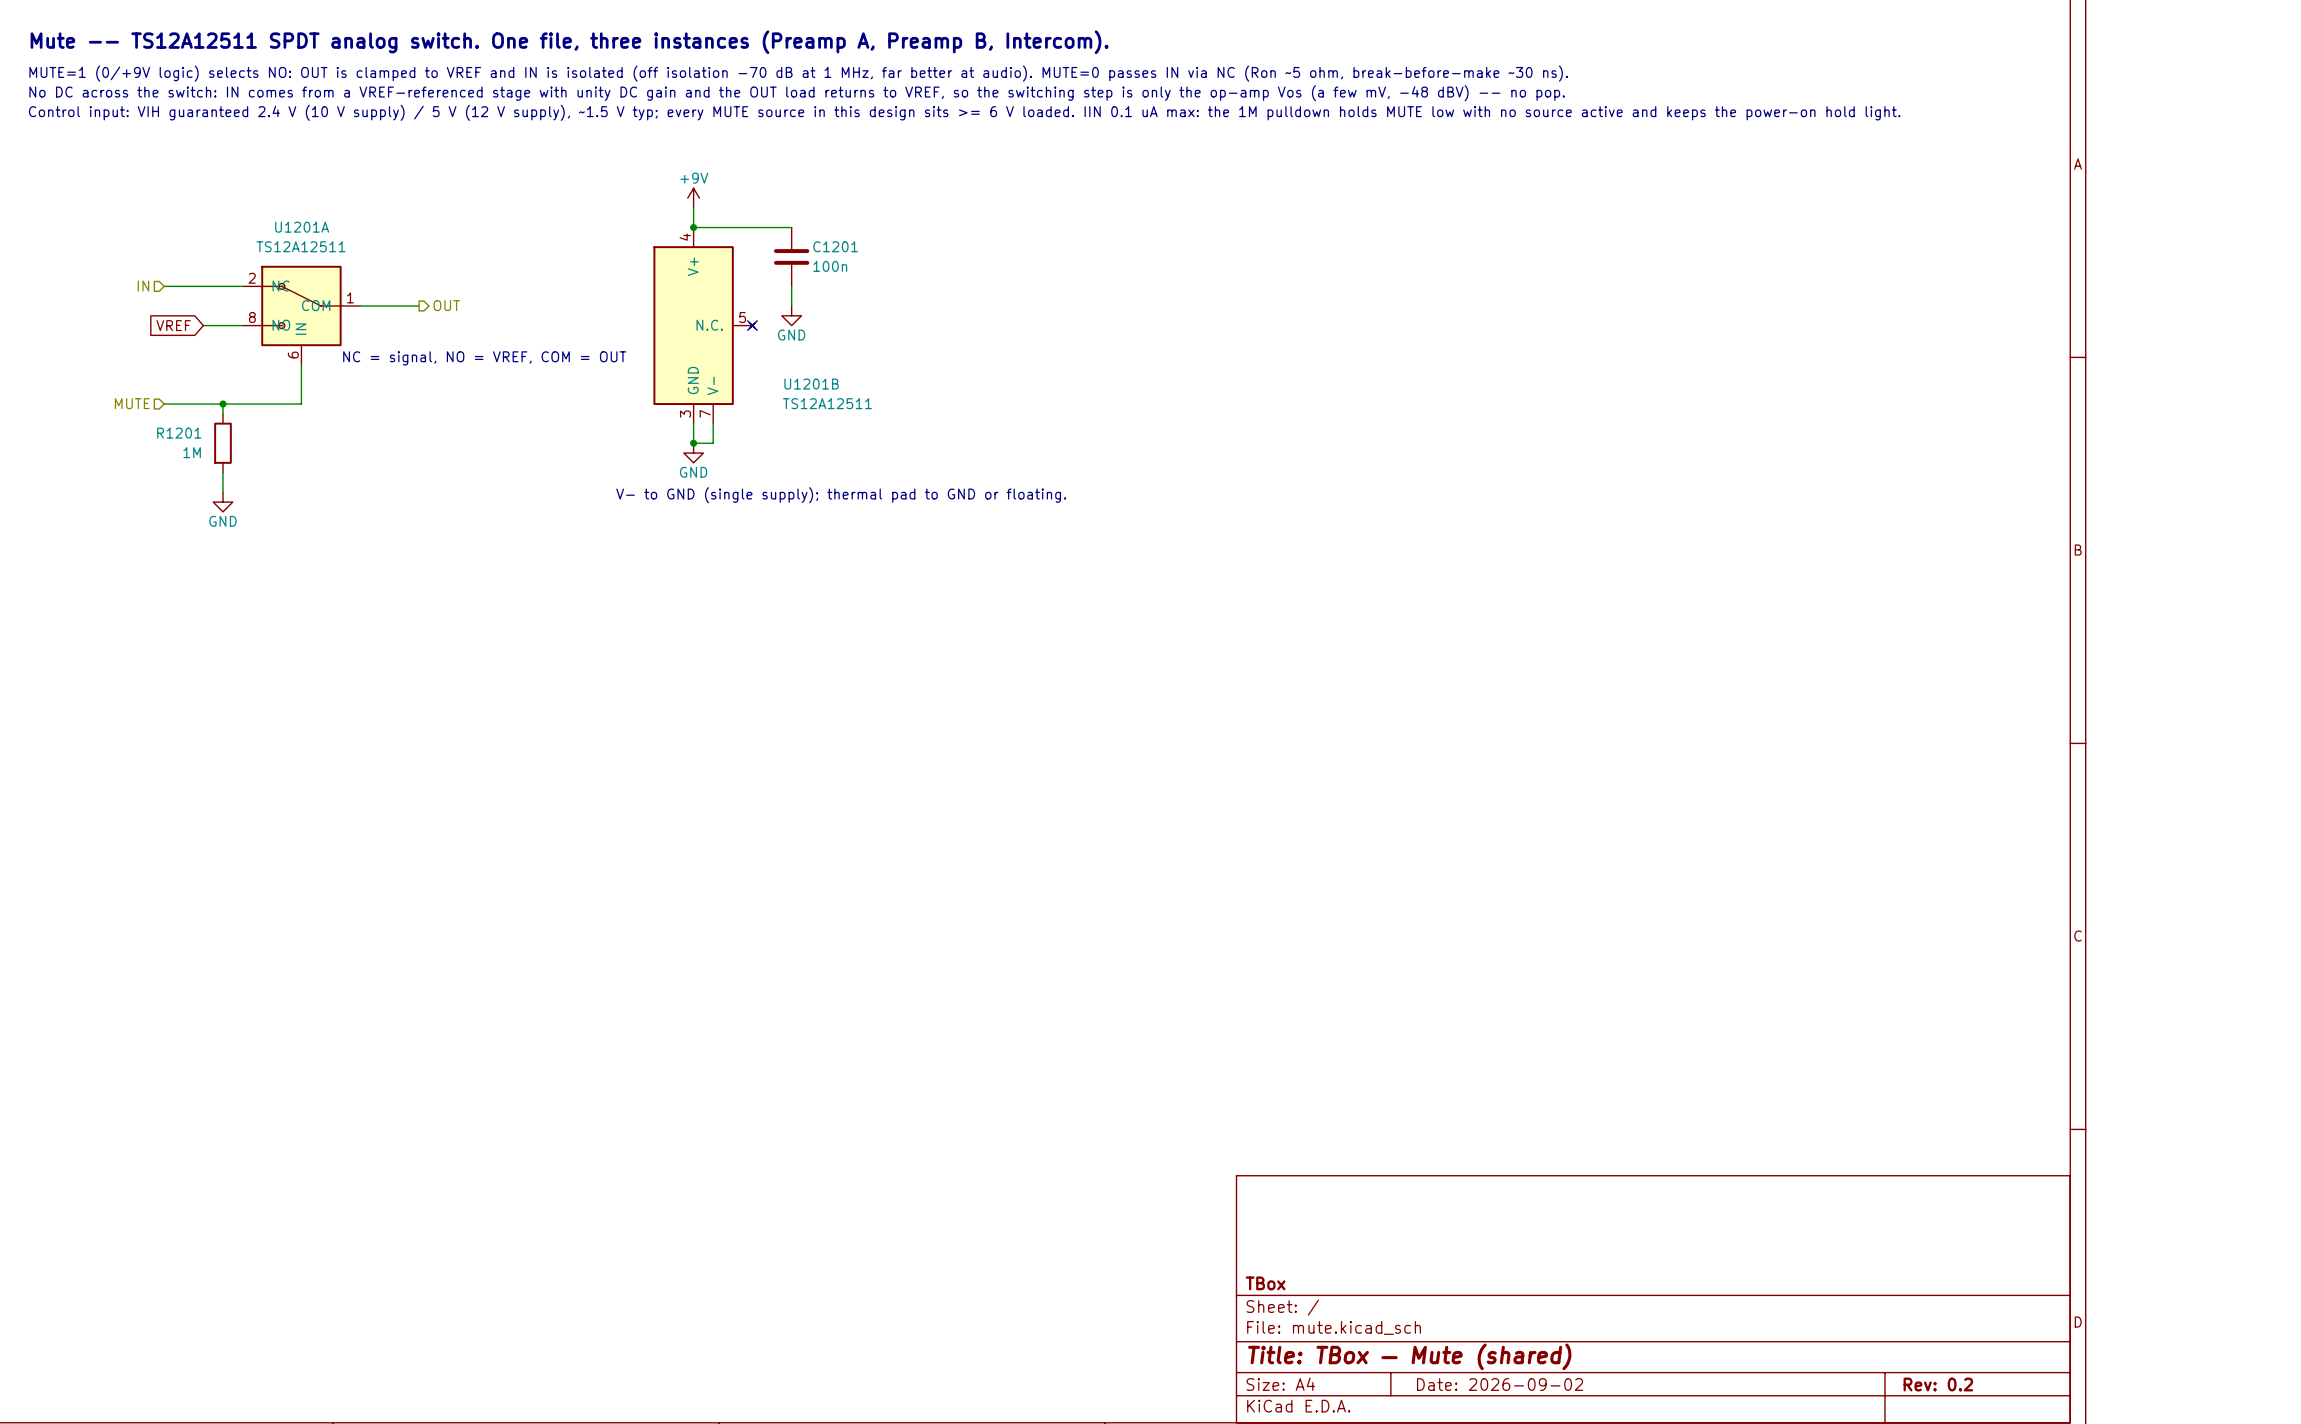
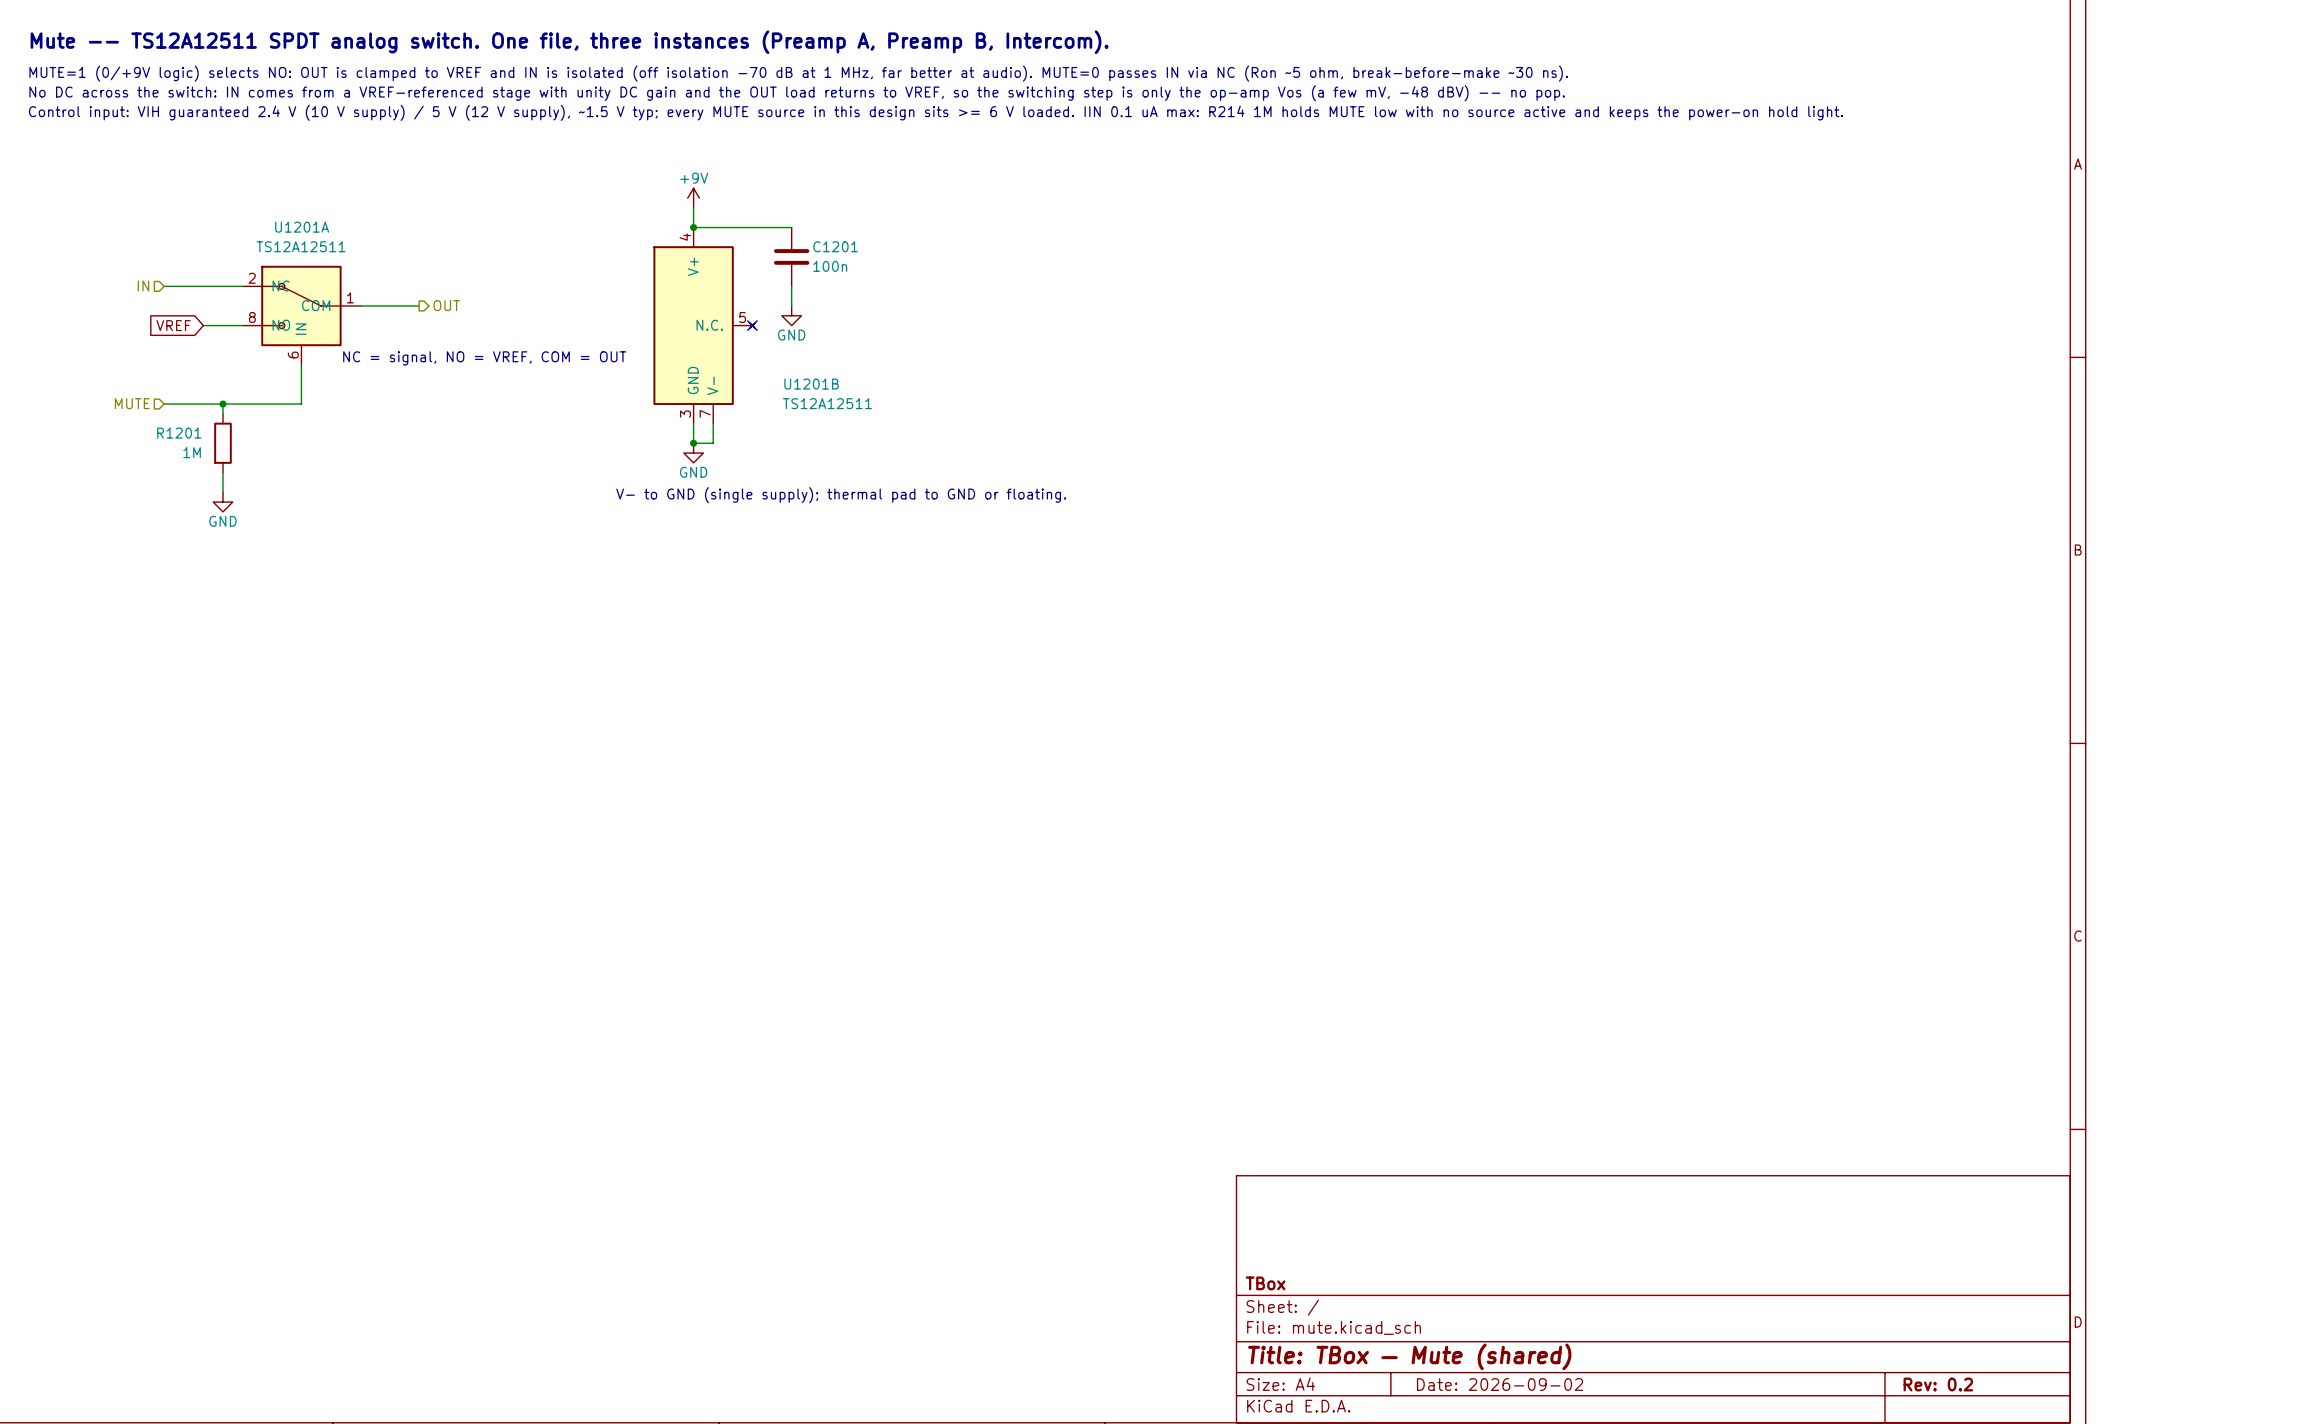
text: Control input: VIH guaranteed 2.4 V (10 V supply) / 5 V (12 V supply), ~1.5 V typ; every MUTE source in this design sits >= 6 V loaded. IIN 0.1 uA max: the 1M pulldown holds MUTE low with no source active and keeps the power-on hold light. (964, 112) -> Control input: VIH guaranteed 2.4 V (10 V supply) / 5 V (12 V supply), ~1.5 V typ; every MUTE source in this design sits >= 6 V loaded. IIN 0.1 uA max: R214 1M holds MUTE low with no source active and keeps the power-on hold light. (935, 112)

